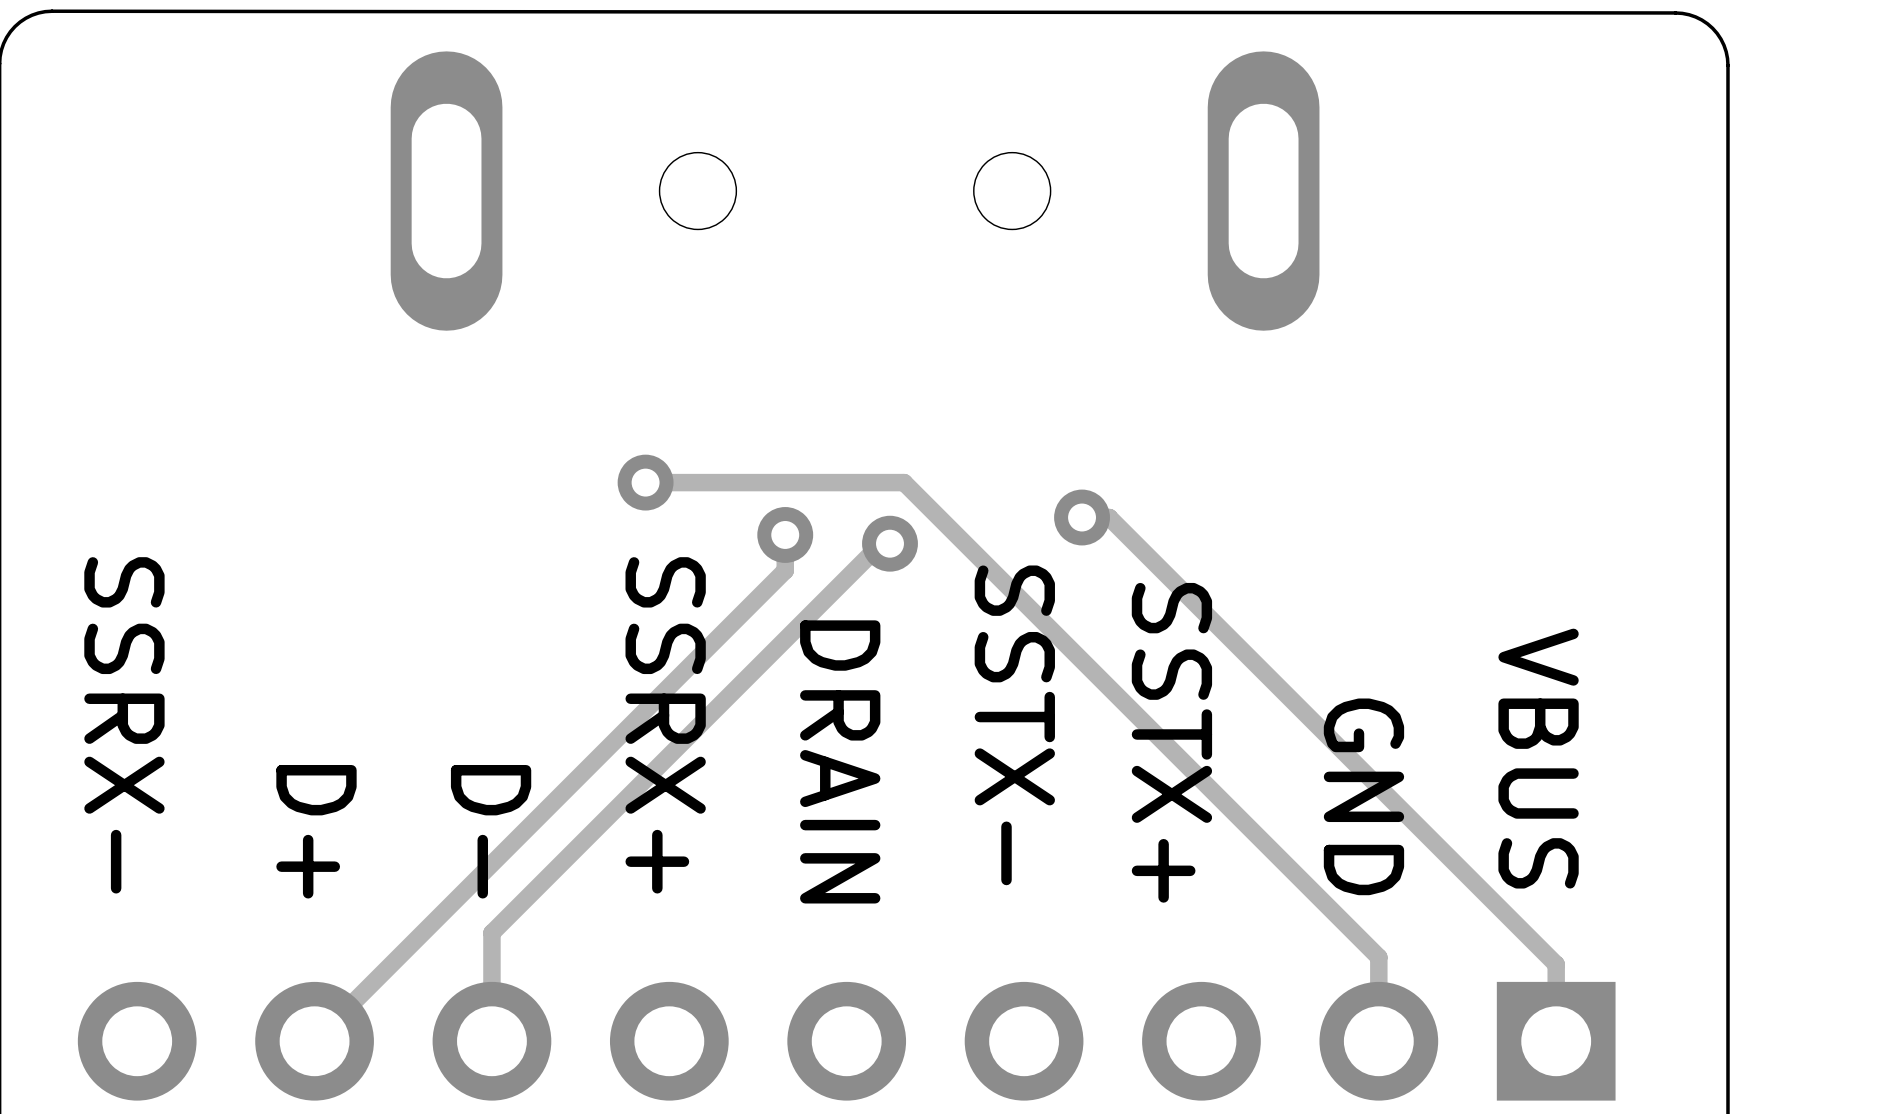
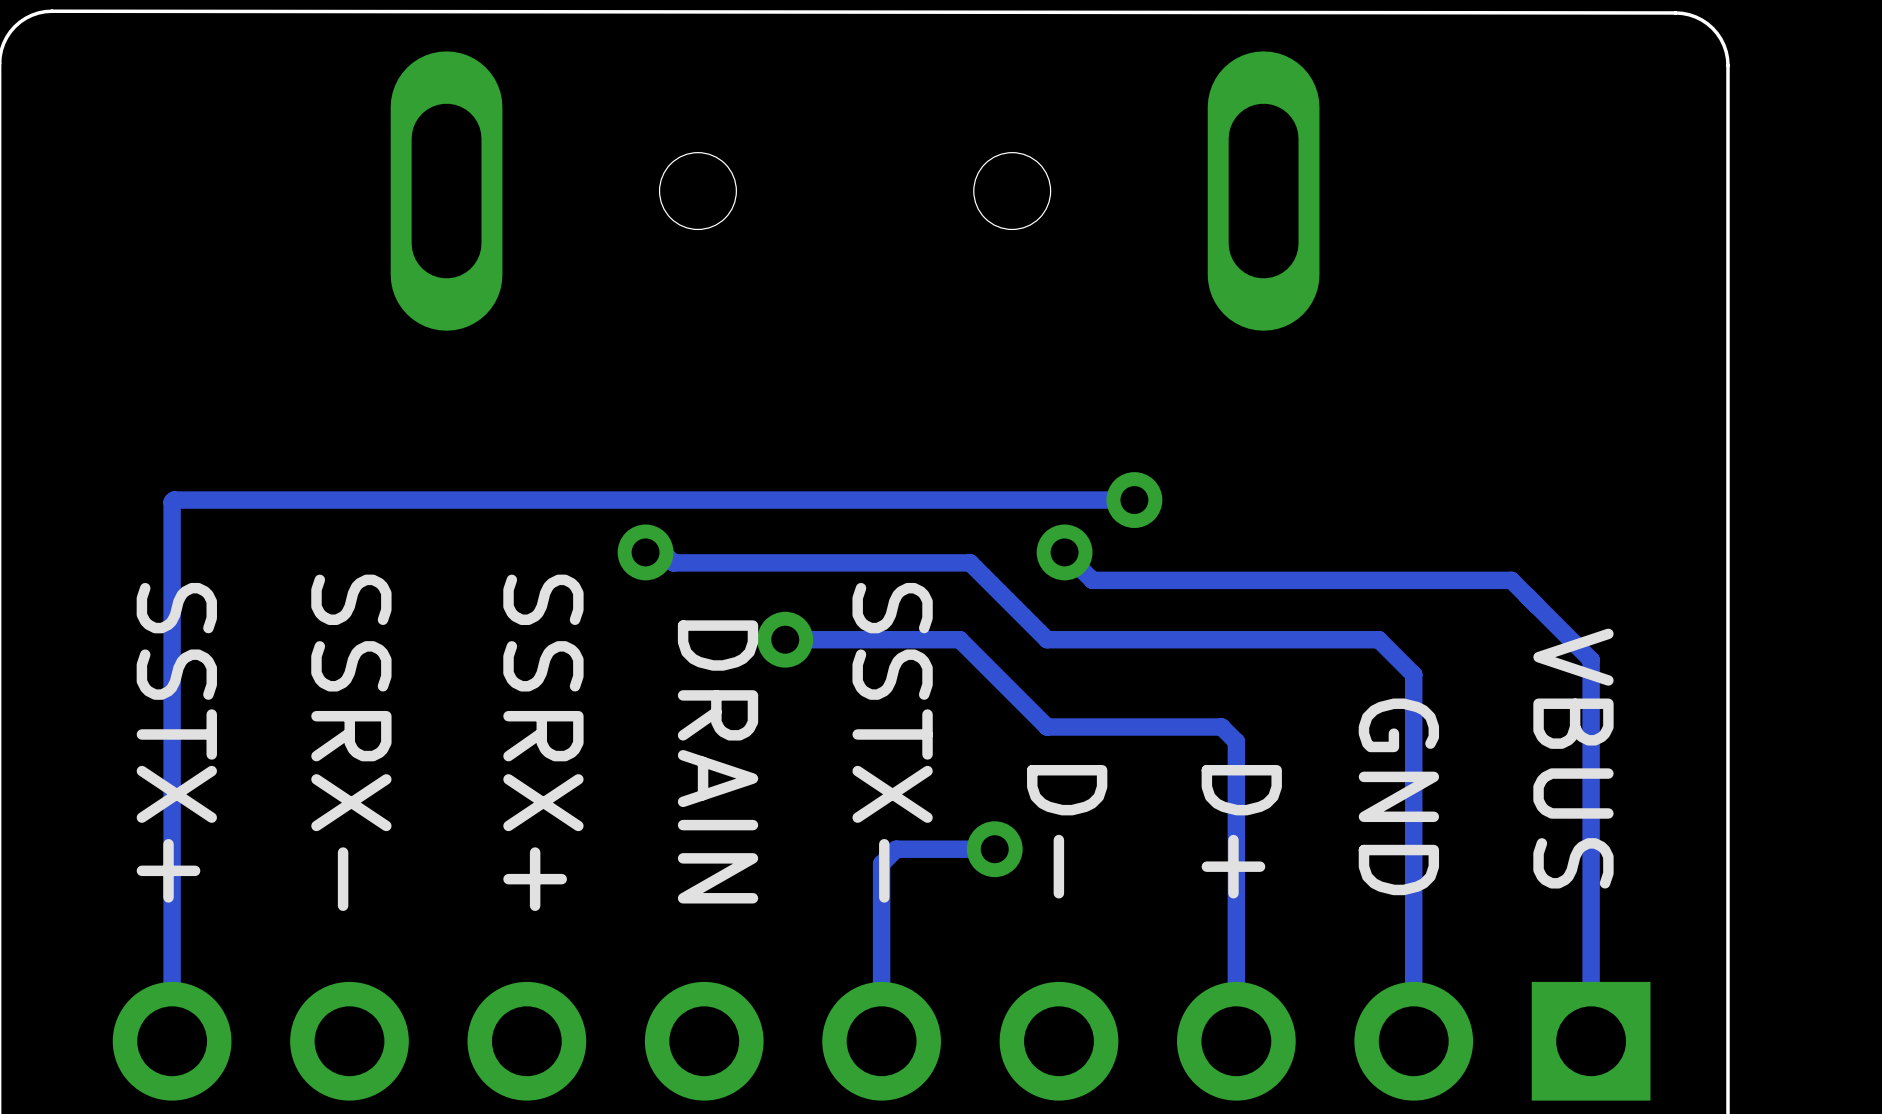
track: (645, 482) (904, 482) (1378, 957) (1378, 1041) -> none
via: (645, 482) -> none
track: none -> (1134, 500) (174, 500) (172, 502) (172, 1041)
via: none -> (1134, 500)
track: (1069, 517) (1109, 517) (1556, 964) (1556, 1041) -> none
via: (1082, 517) -> none
track: none -> (645, 534) (673, 562) (970, 562) (1047, 639) (1378, 639) (1413, 674) (1413, 1041)
track: (785, 534) (785, 570) (314, 1041) -> none
via: (785, 534) -> none
track: (889, 534) (491, 933) (491, 1041) -> none
via: (889, 543) -> none
via: none -> (645, 552)
track: none -> (1064, 552) (1092, 580) (1511, 580) (1591, 659) (1591, 1041)
via: none -> (1064, 552)
track: none -> (785, 639) (959, 639) (1047, 727) (1221, 727) (1236, 741) (1236, 1041)
via: none -> (785, 639)
text position: SSRX- (124, 725) -> SSRX- (351, 742)
text position: SSRX+ (665, 725) -> SSRX+ (543, 742)
text position: SSTX- (1014, 725) -> SSTX- (892, 742)
text position: SSTX+ (1171, 742) -> SSTX+ (176, 742)
text position: VBUS (1538, 758) -> VBUS (1573, 758)
text position: DRAIN (840, 761) -> DRAIN (718, 761)
text position: GND (1363, 796) -> GND (1398, 796)
text position: D+ (316, 831) -> D+ (1241, 831)
text position: D- (491, 831) -> D- (1067, 831)
track: none -> (994, 849) (896, 849) (881, 863) (881, 1041)
via: none -> (994, 849)
part position: (846, 1041) -> (881, 1041)

